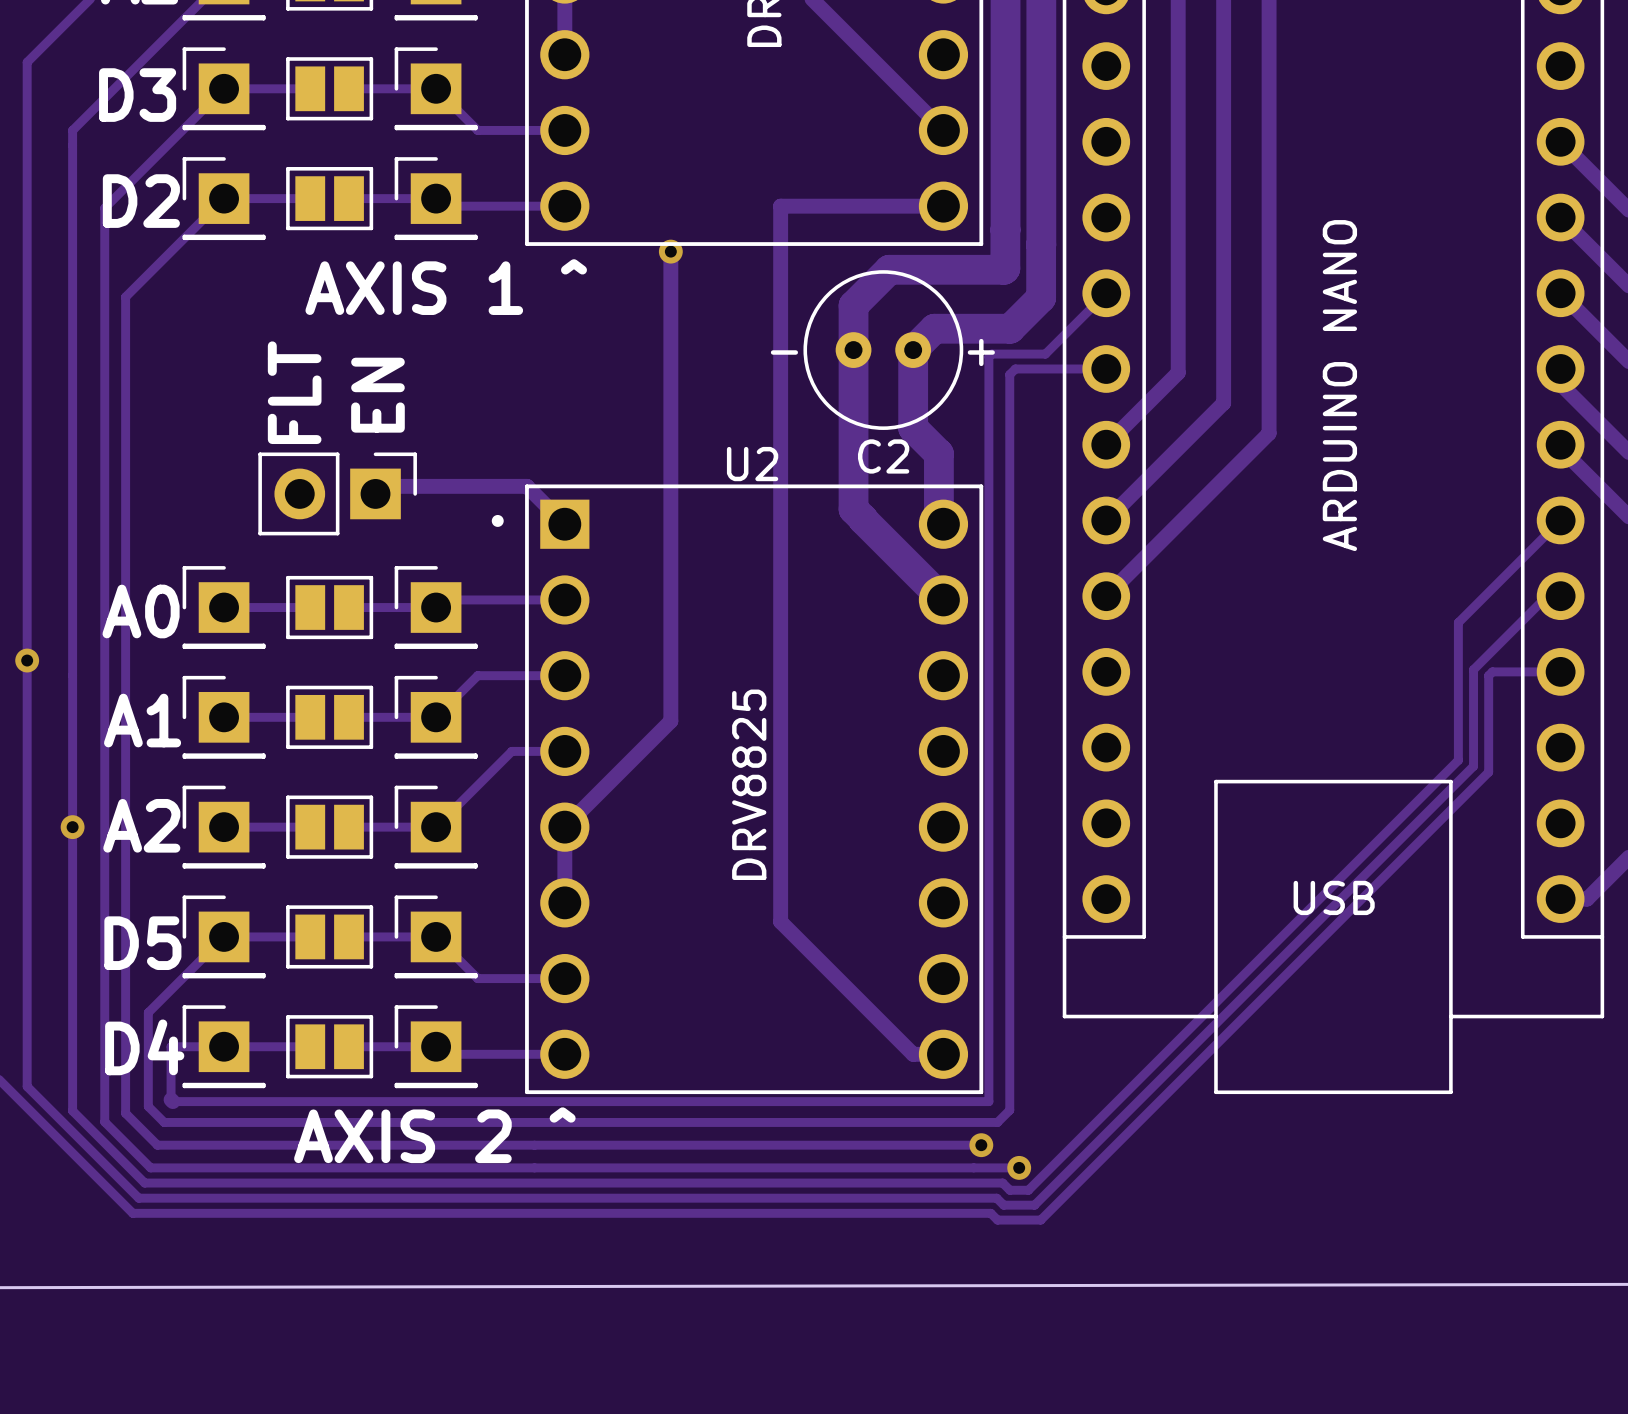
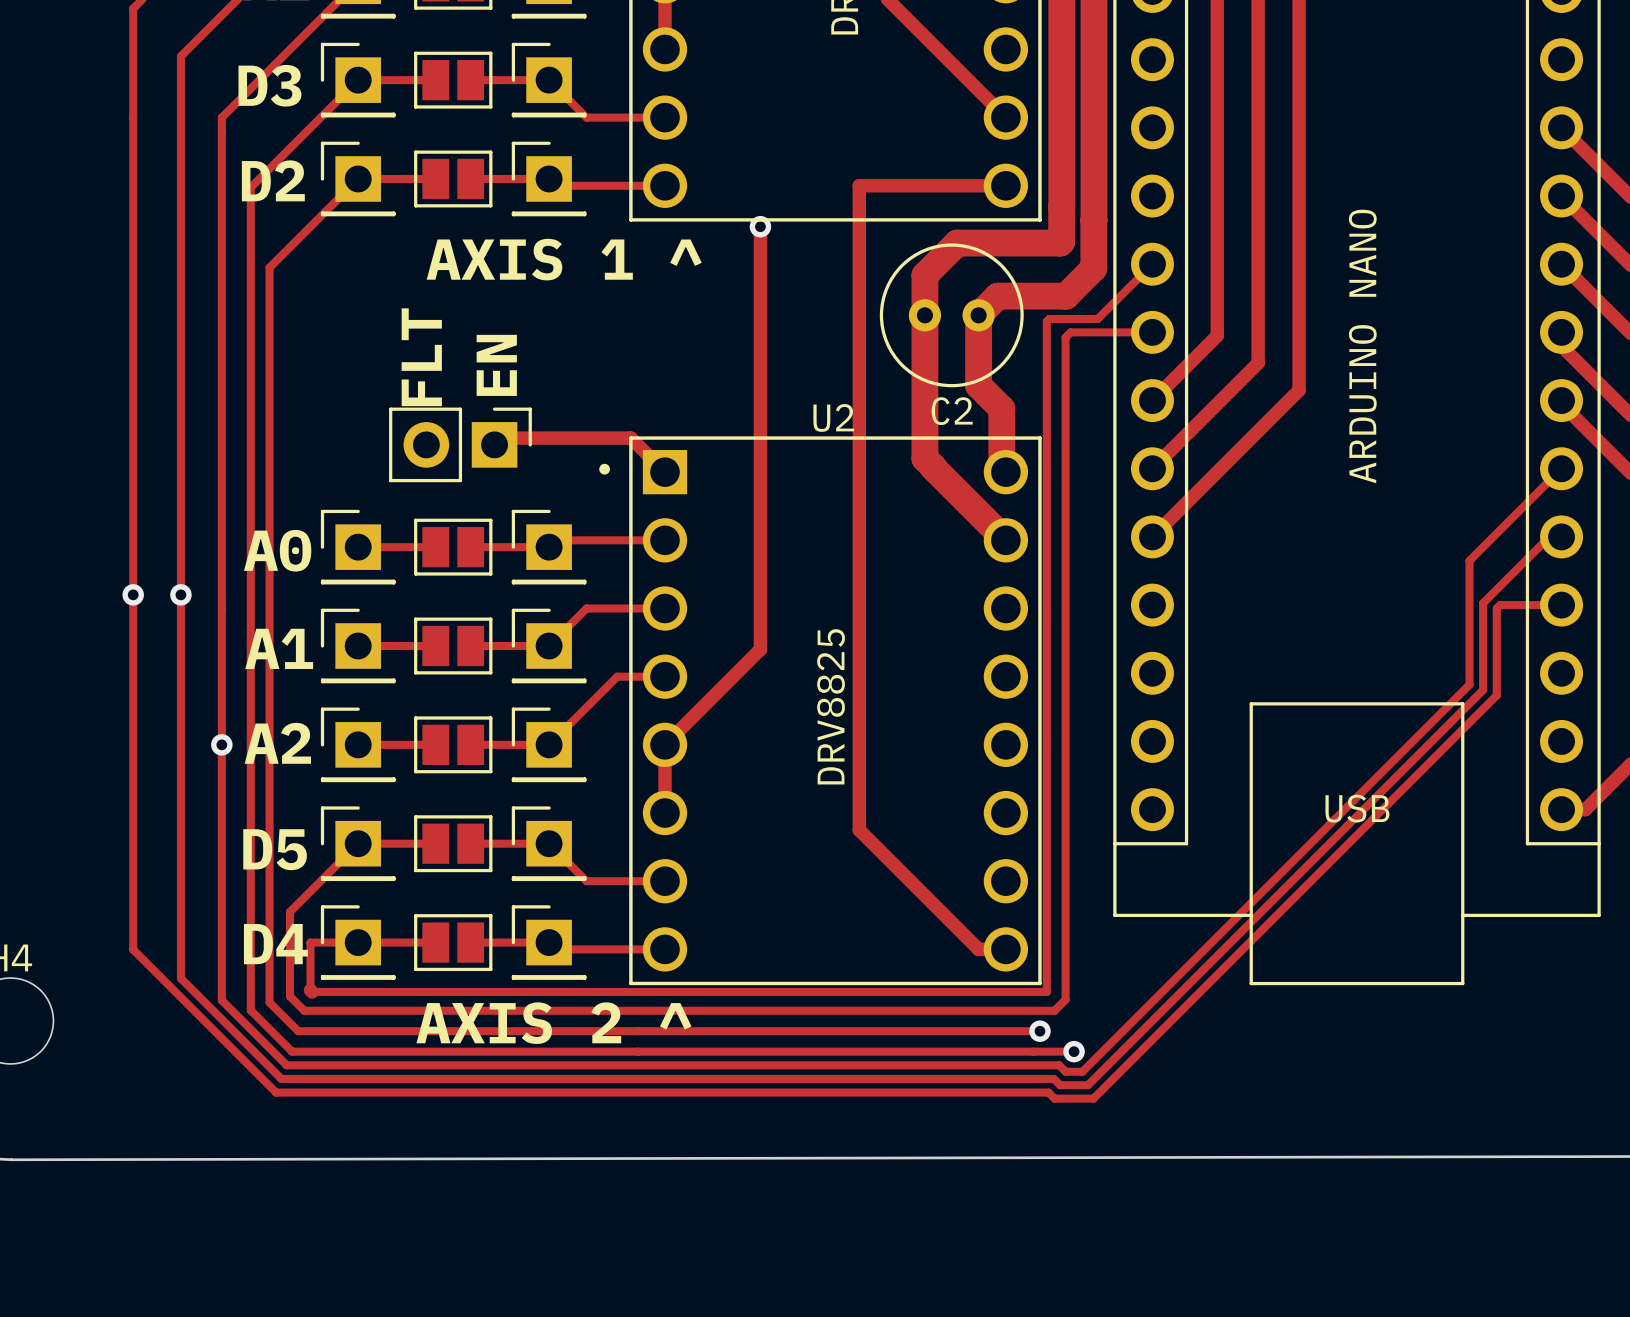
text: - (784, 352) -> none
text: + (981, 352) -> none

